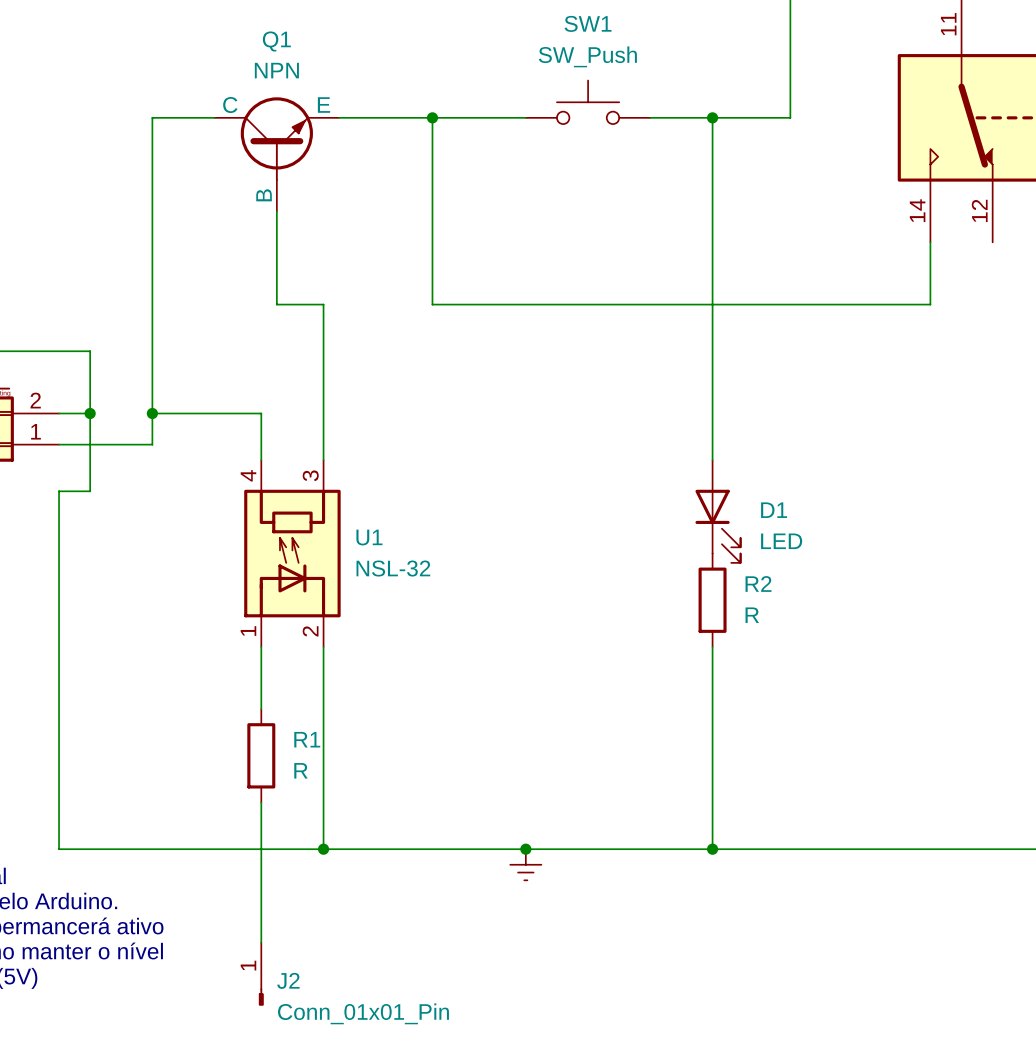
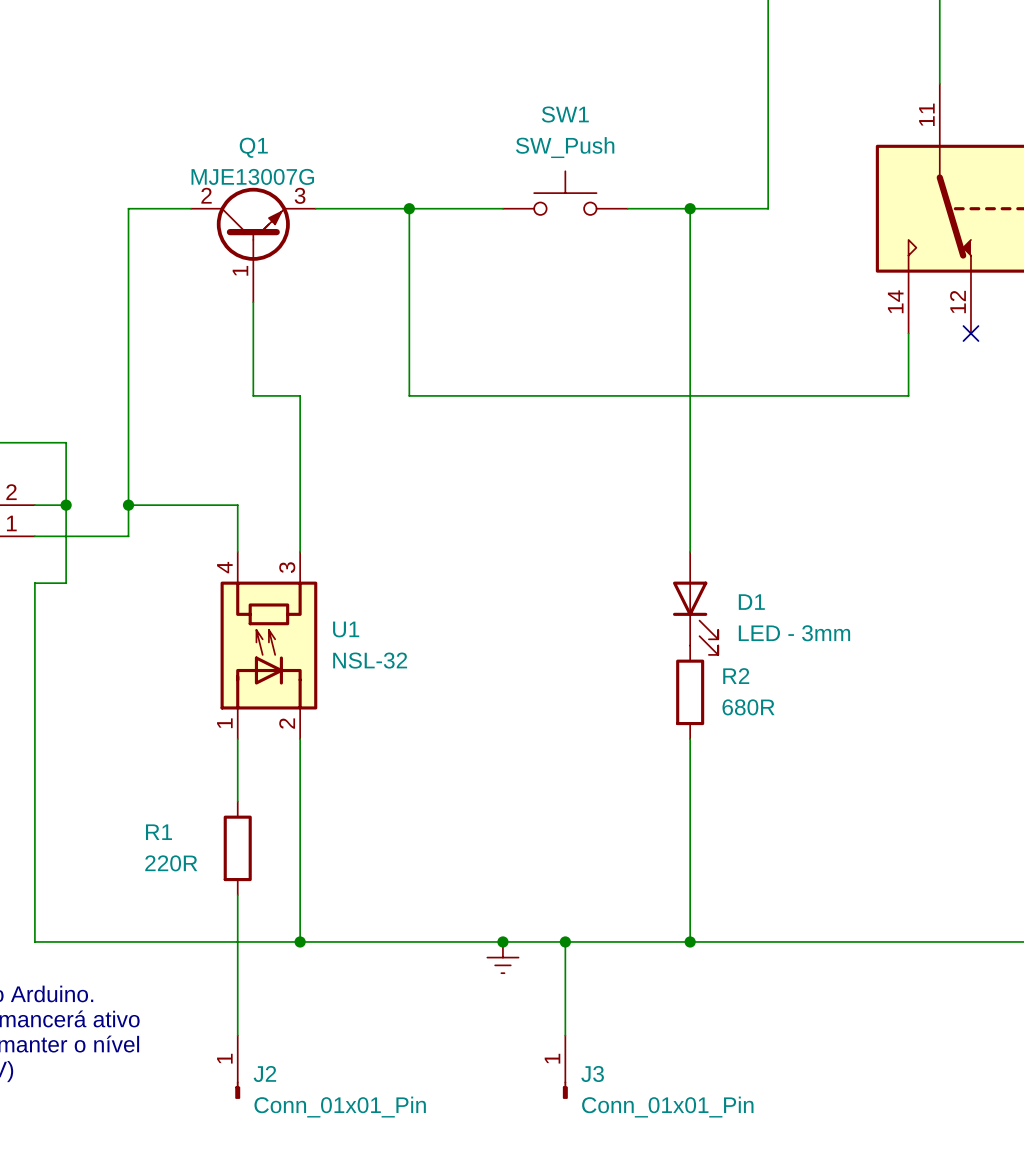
Q1 value: NPN (276, 70) -> MJE13007G (252, 176)
Q1 symbol: [214, 97, 340, 212] -> [190, 187, 316, 303]
no-connect mark: none -> (970, 333)
D1 value: LED (781, 541) -> LED - 3mm (794, 633)
R2 value: R (752, 615) -> 680R (748, 707)
R1 name position: R1 (307, 739) -> R1 (158, 832)
R1 value: R (301, 770) -> 220R (171, 863)
wire: none -> (565, 941) (565, 1035)
junction: none -> (565, 941)
J3: none -> Conn_01x01_Pin (565, 1067)

